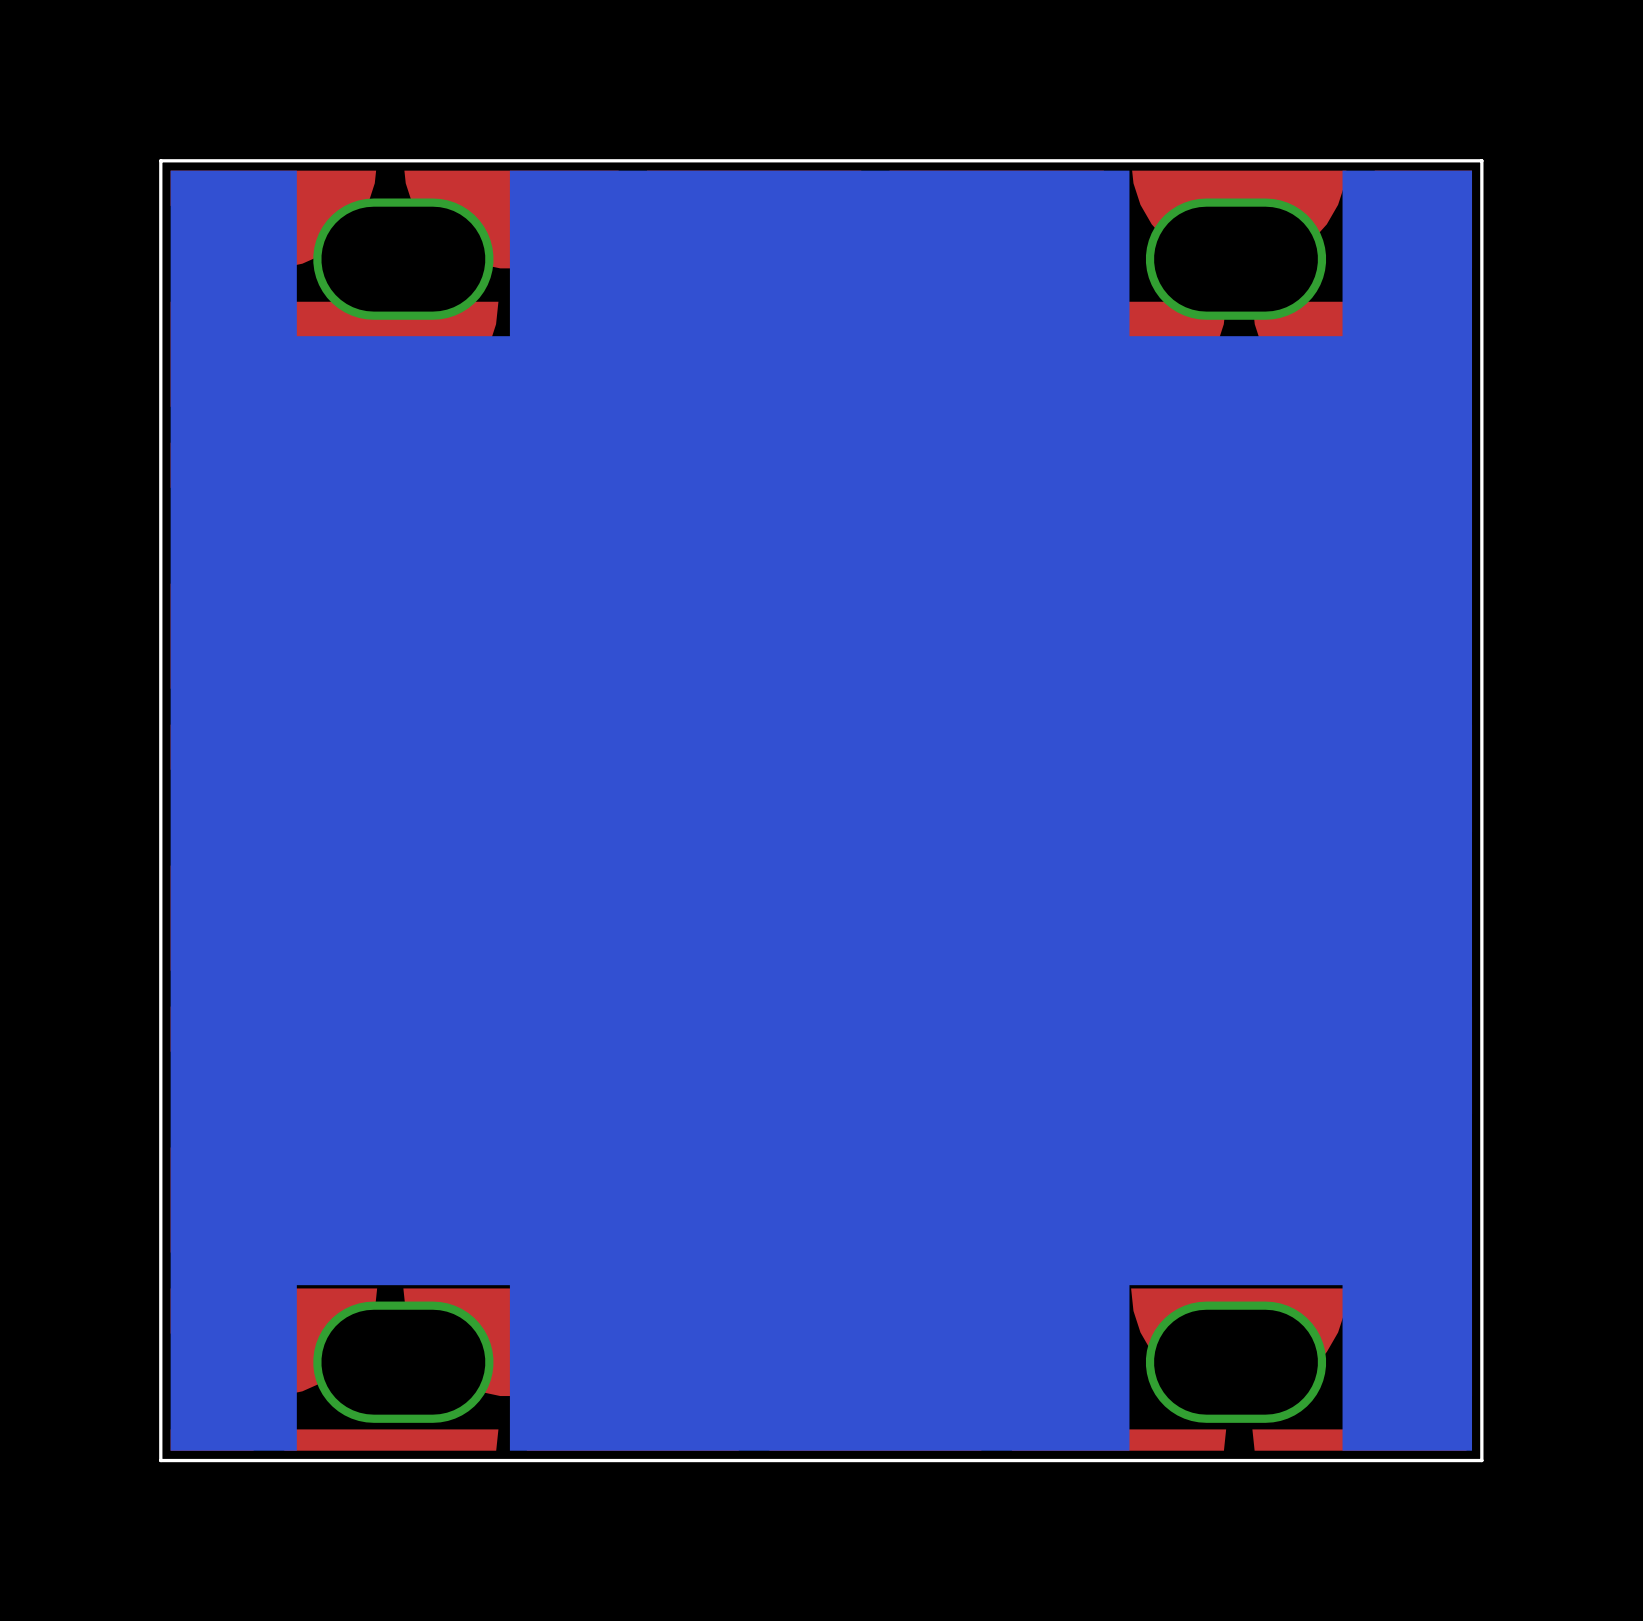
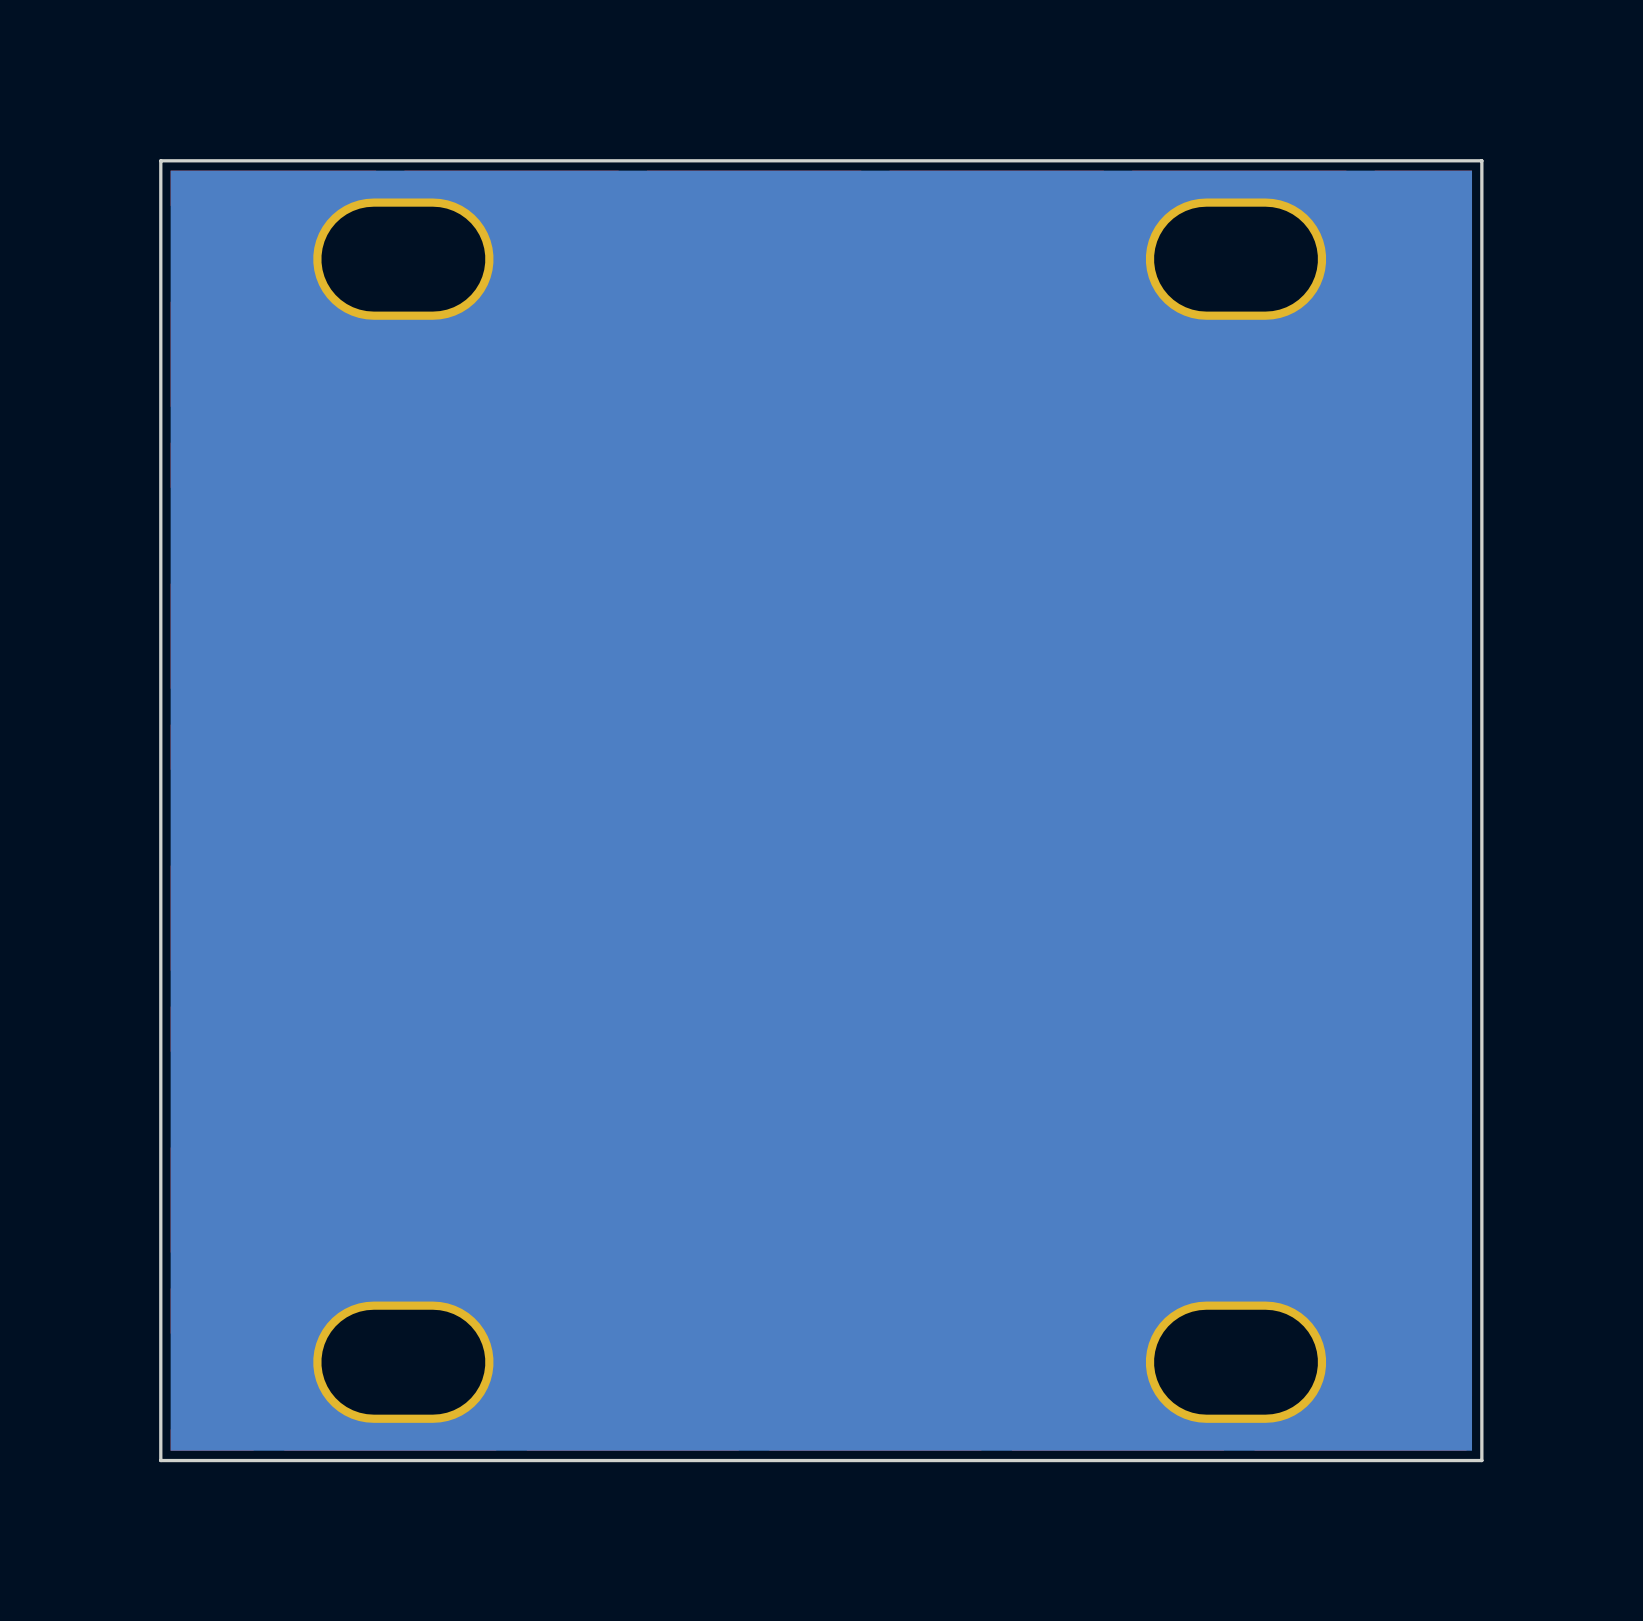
drawing: [170, 170, 297, 1451] -> none
drawing: [509, 170, 1130, 337] -> none
drawing: [1342, 170, 1473, 1451] -> none
drawing shape: [296, 336, 1343, 1286] -> [170, 170, 1473, 1451]
drawing: [509, 1285, 1130, 1451] -> none

